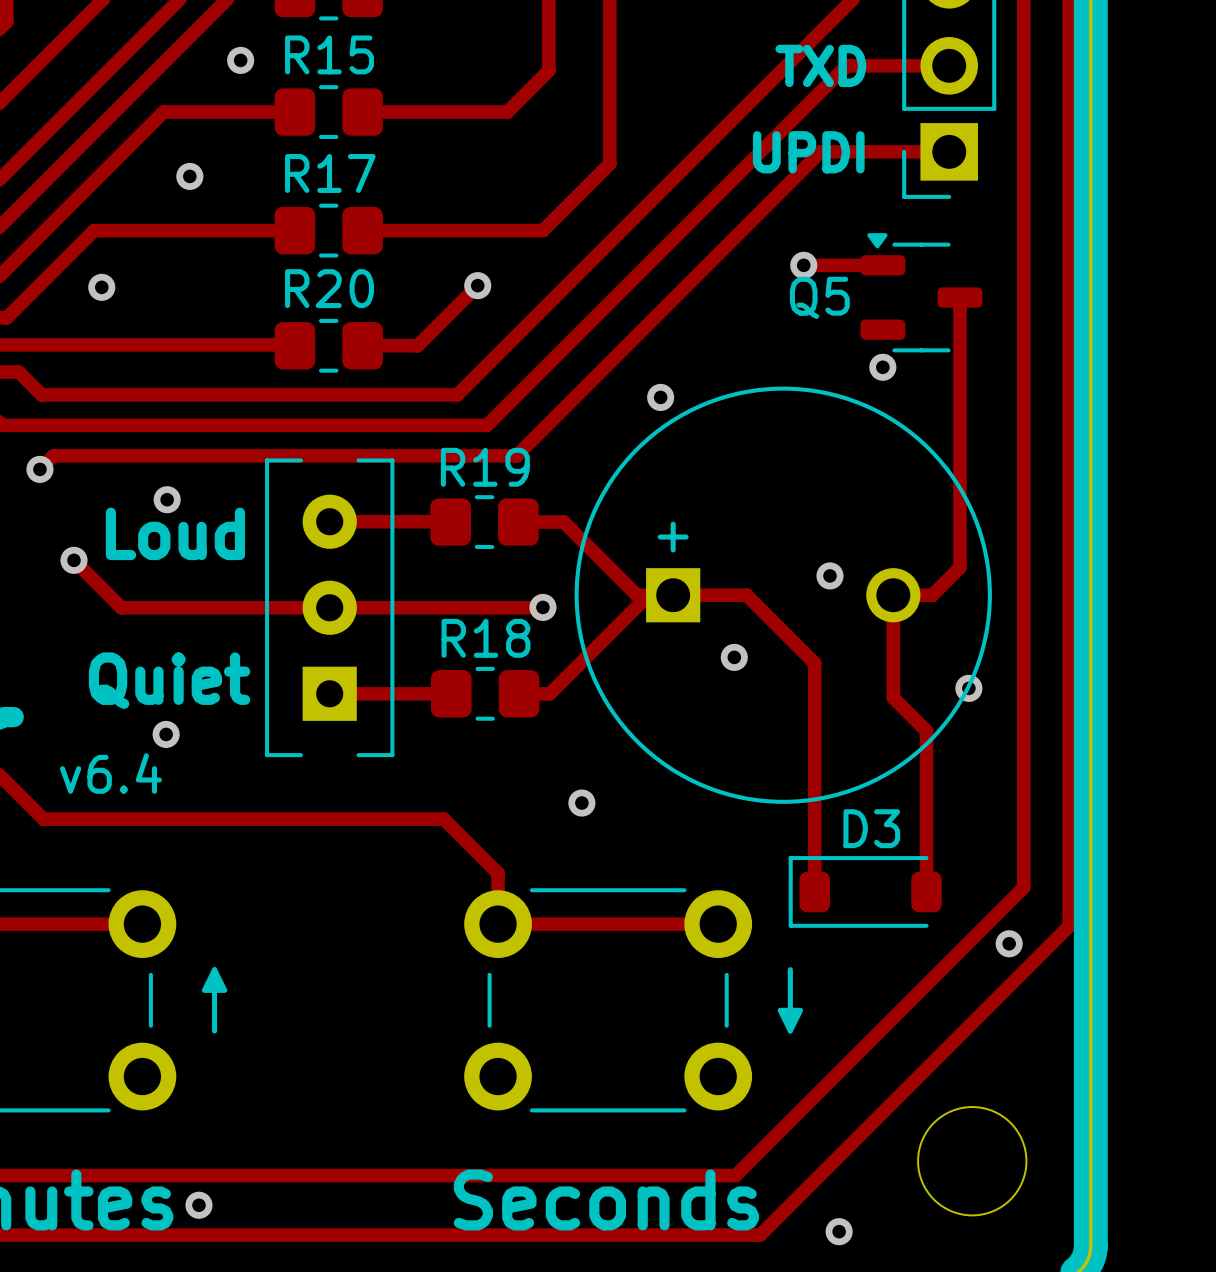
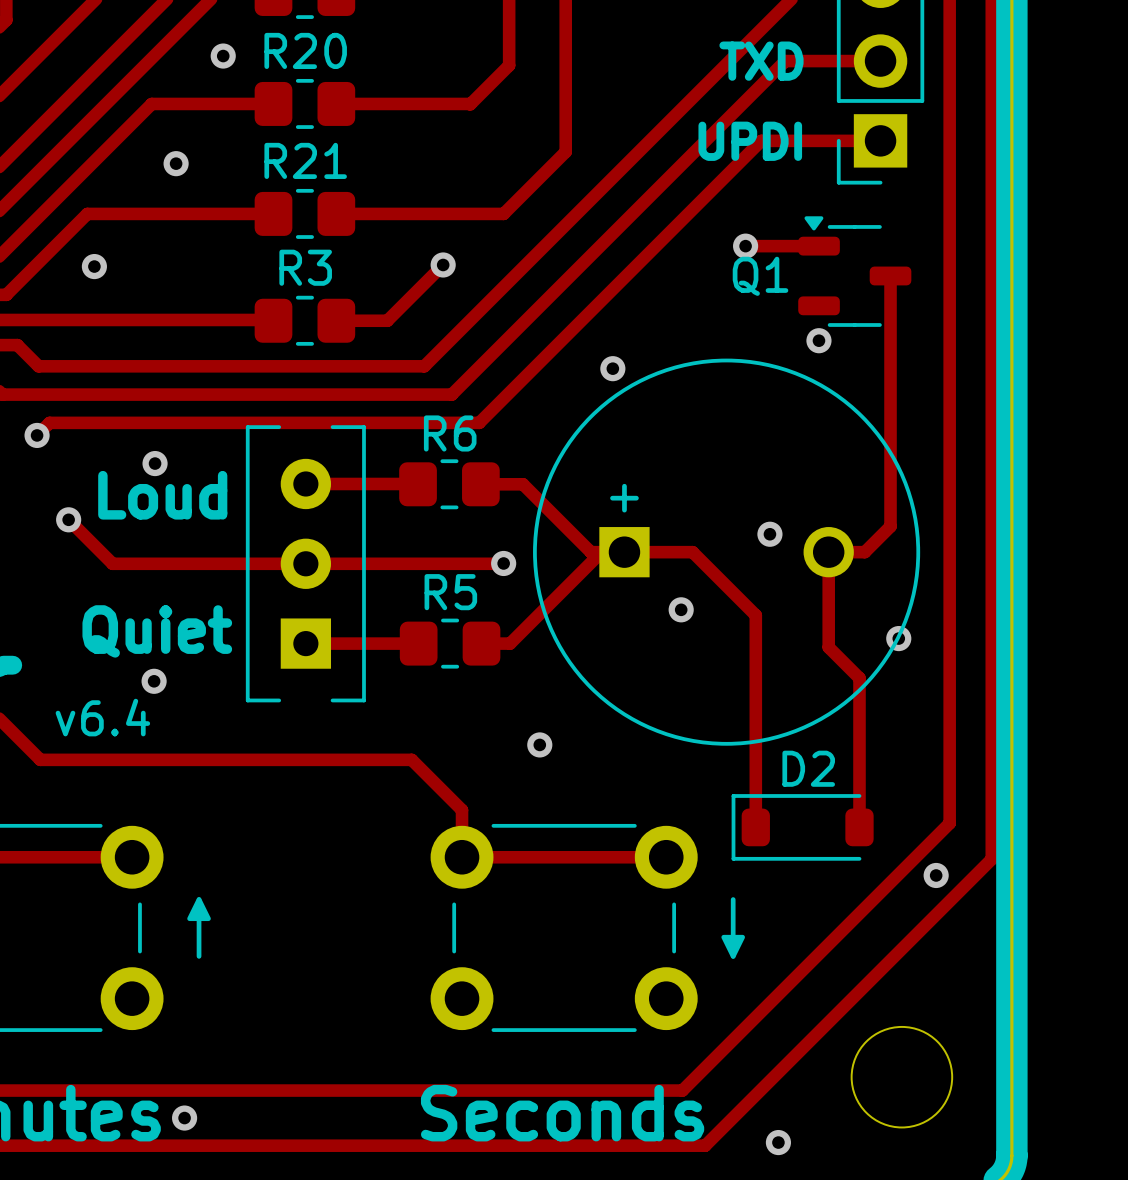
R15 name: R15 (329, 54) -> R20 (305, 50)
R17 name: R17 (330, 173) -> R21 (305, 160)
R20 name: R20 (329, 288) -> R3 (305, 267)
Q5 name: Q5 (819, 297) -> Q1 (760, 276)
R19 name: R19 (485, 467) -> R6 (450, 433)
R18 name: R18 (486, 638) -> R5 (450, 592)
D3 name: D3 (871, 828) -> D2 (808, 768)

